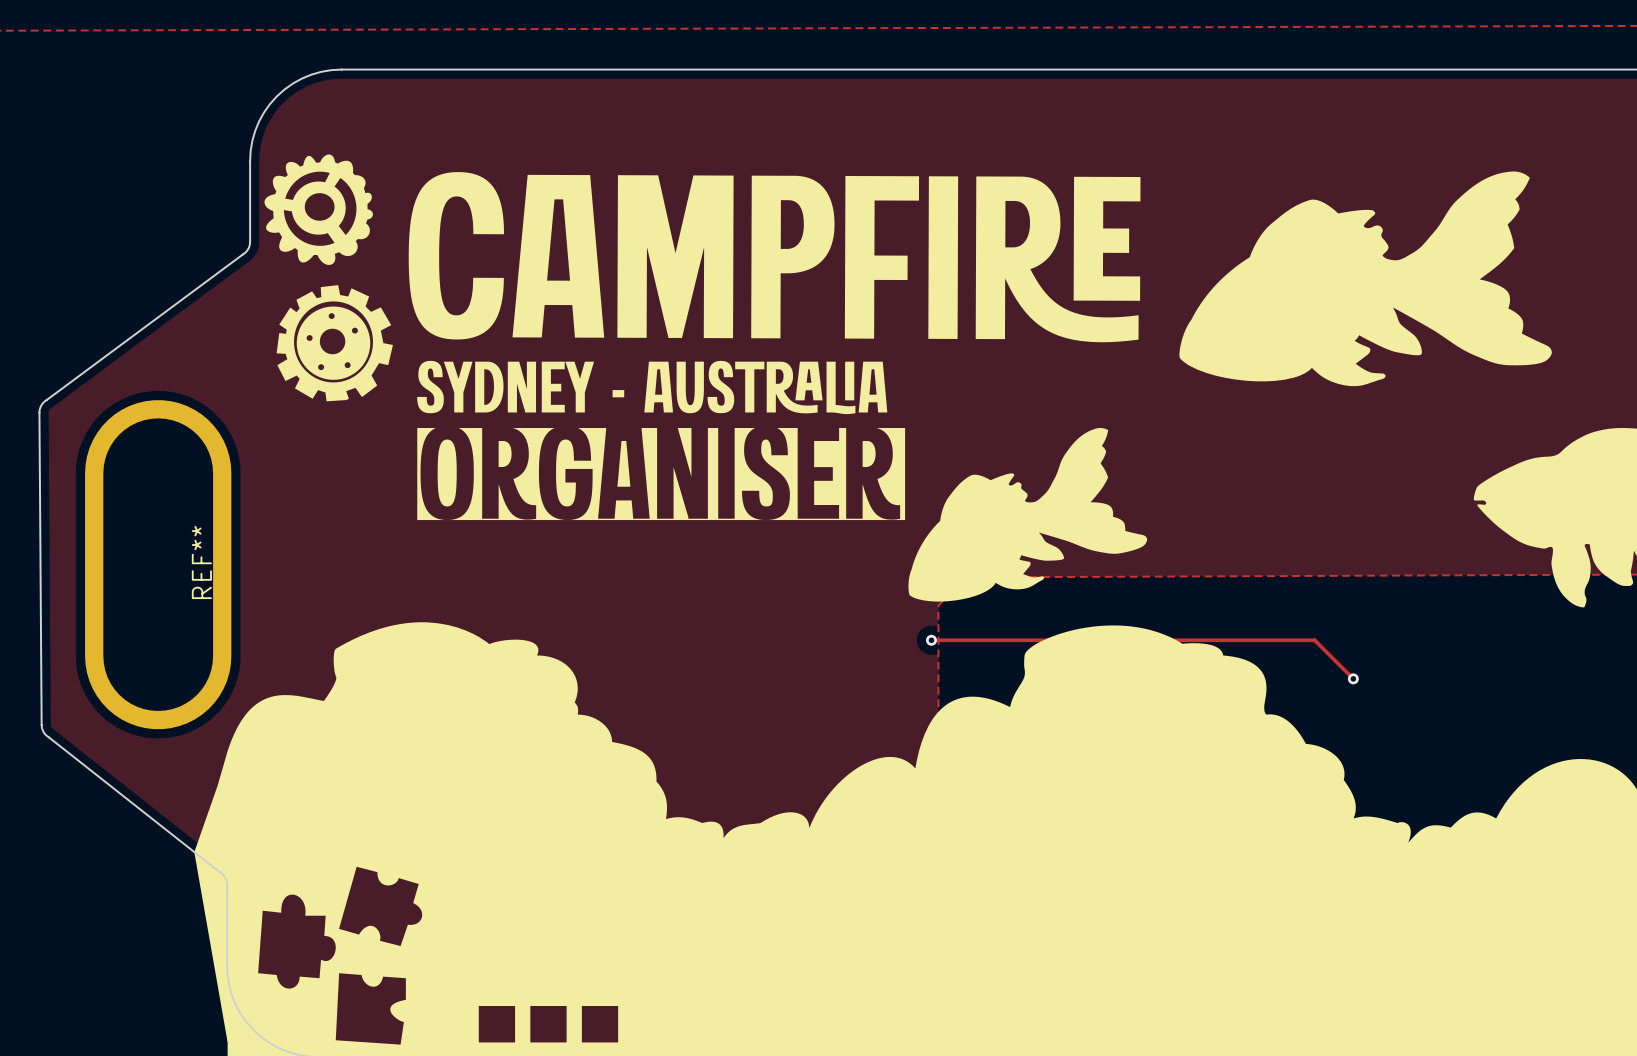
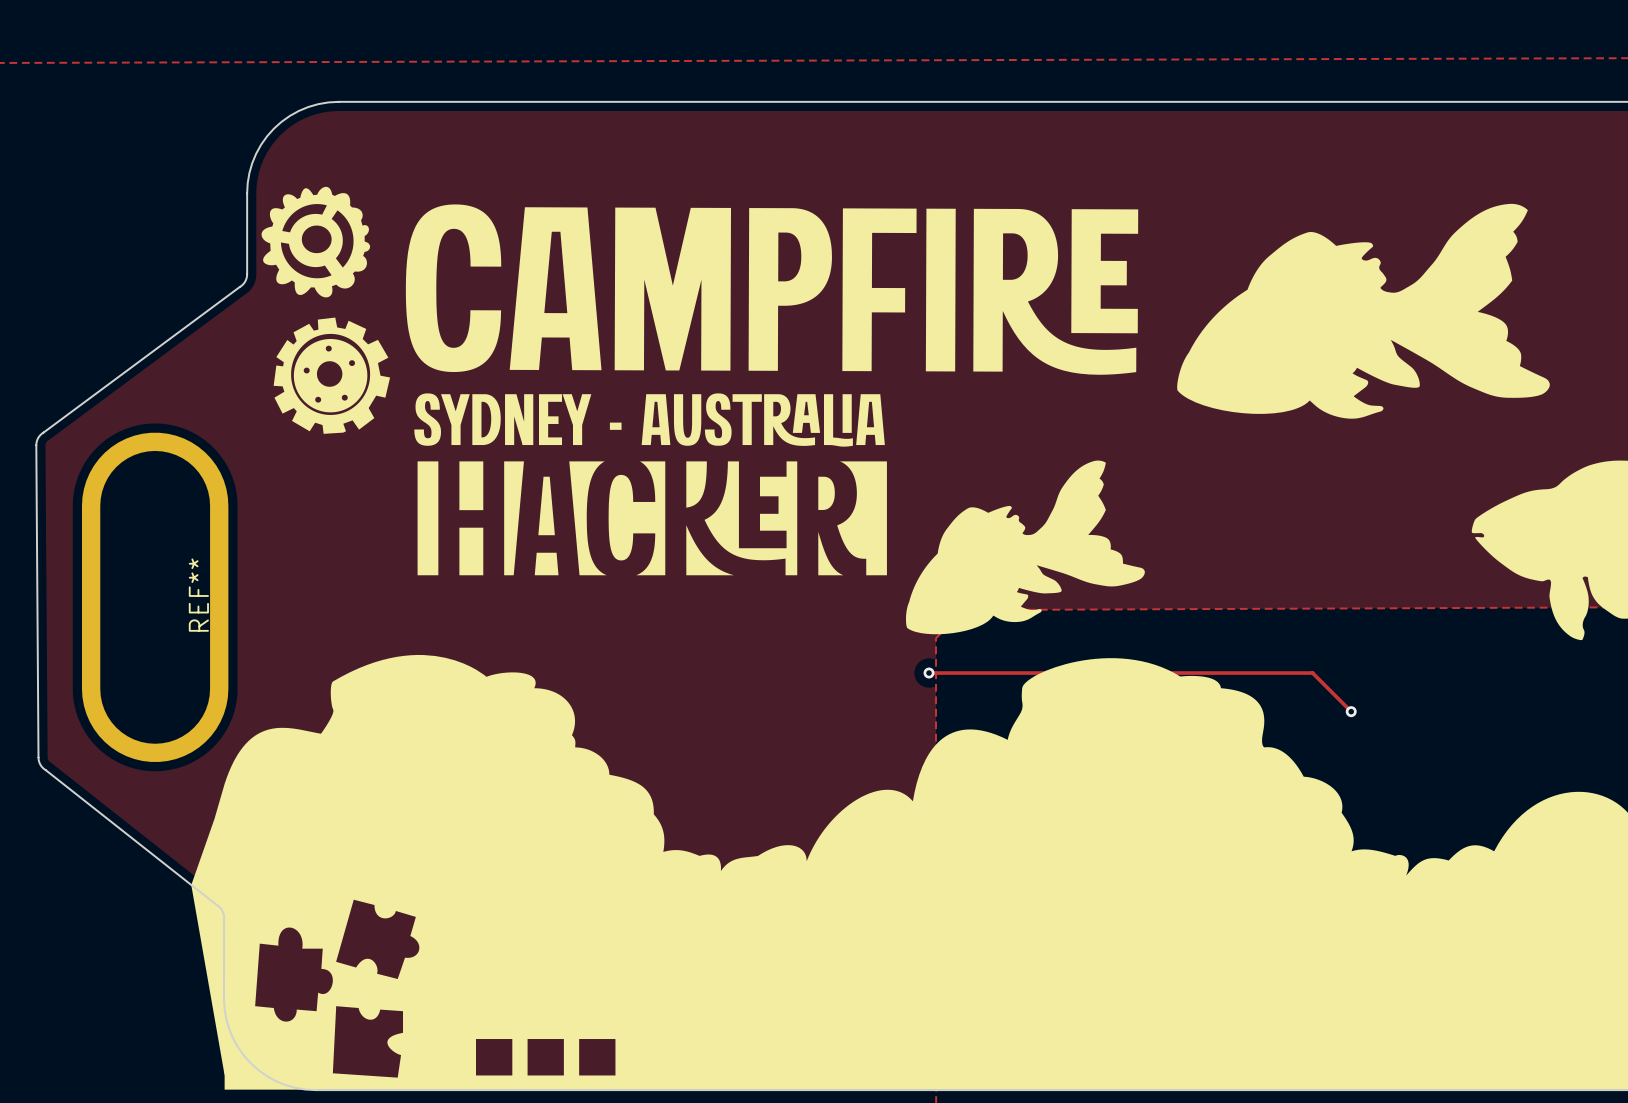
drawing: [417, 428, 457, 521] -> none
drawing: none -> [417, 461, 484, 576]
drawing shape: [447, 428, 568, 521] -> [504, 461, 524, 576]
drawing: none -> [534, 461, 887, 576]
drawing: [556, 428, 773, 521] -> none
drawing shape: [677, 428, 692, 477] -> [686, 461, 707, 508]
drawing shape: [761, 428, 906, 521] -> [818, 476, 835, 510]
drawing: [498, 441, 512, 467] -> none
drawing: [862, 441, 876, 467] -> none

